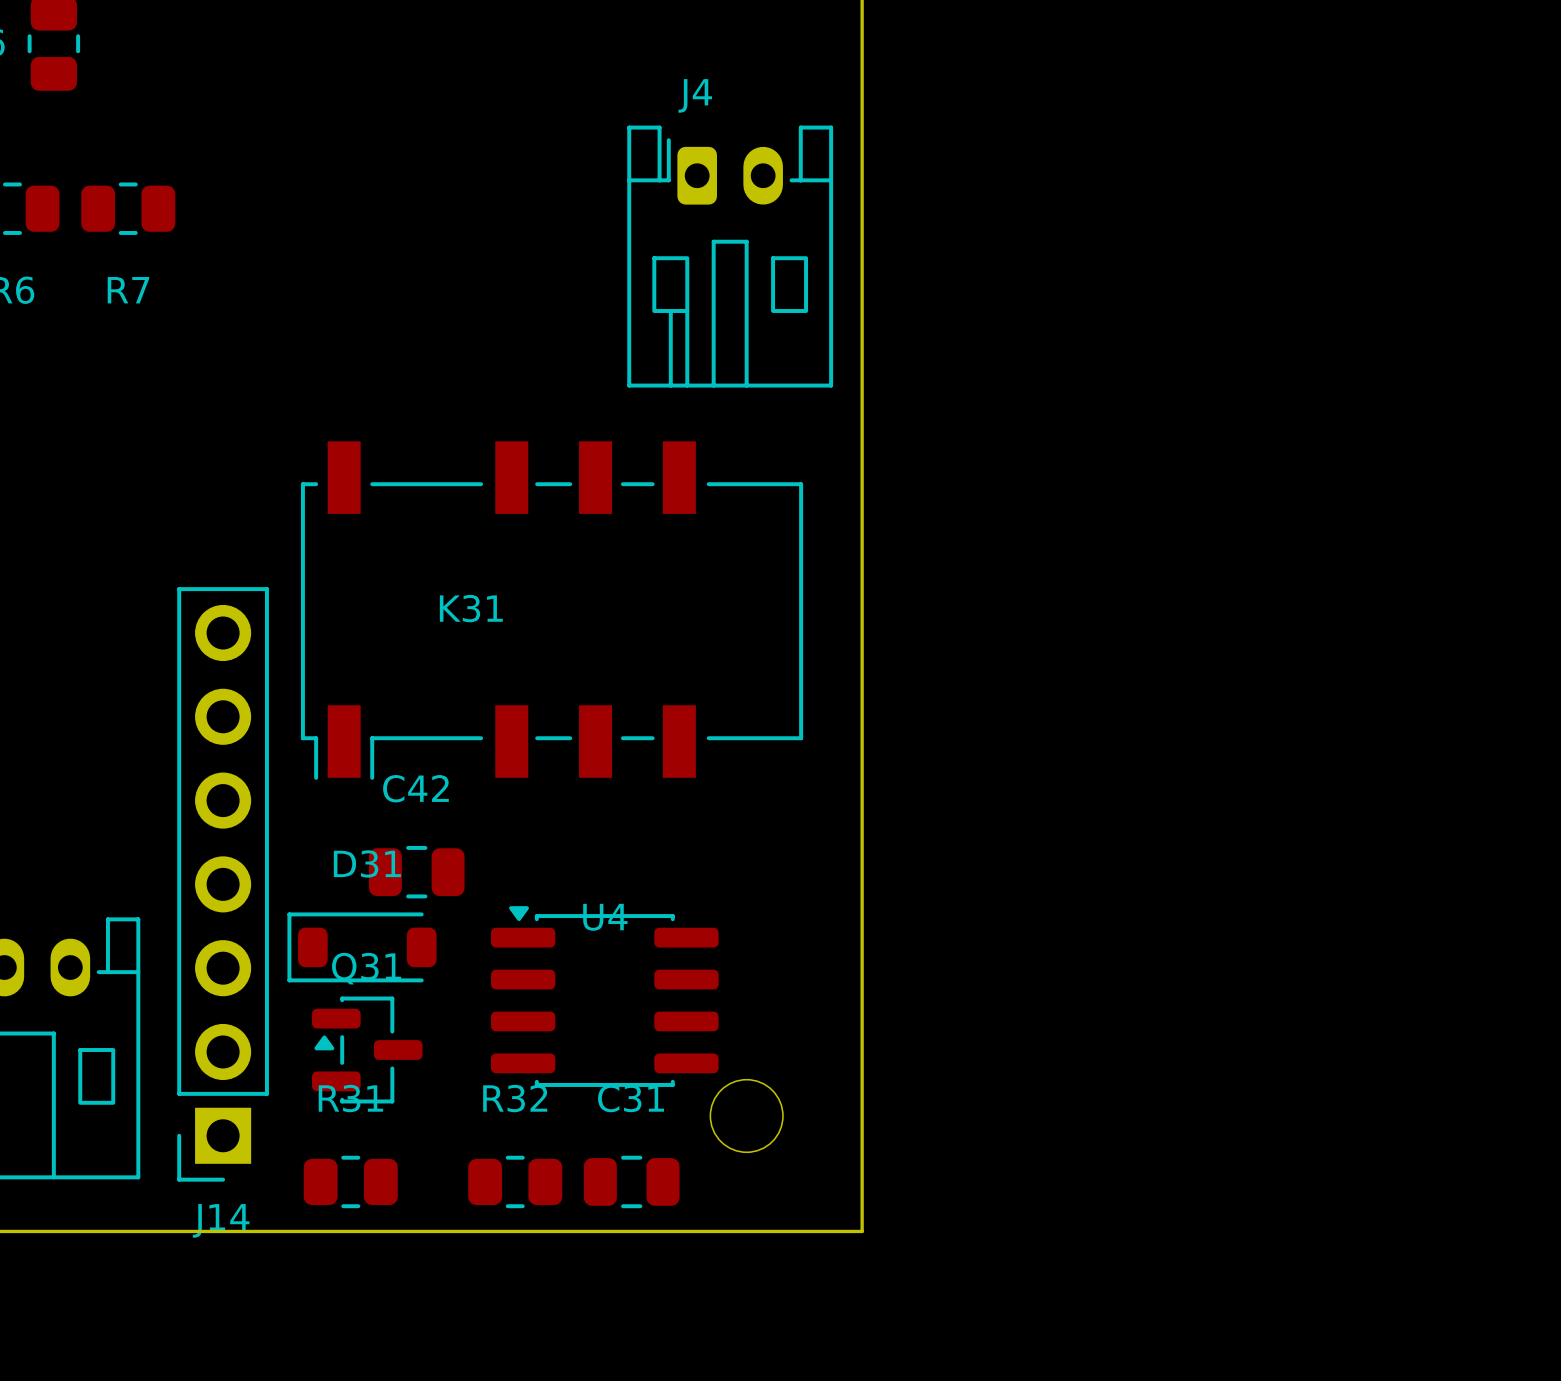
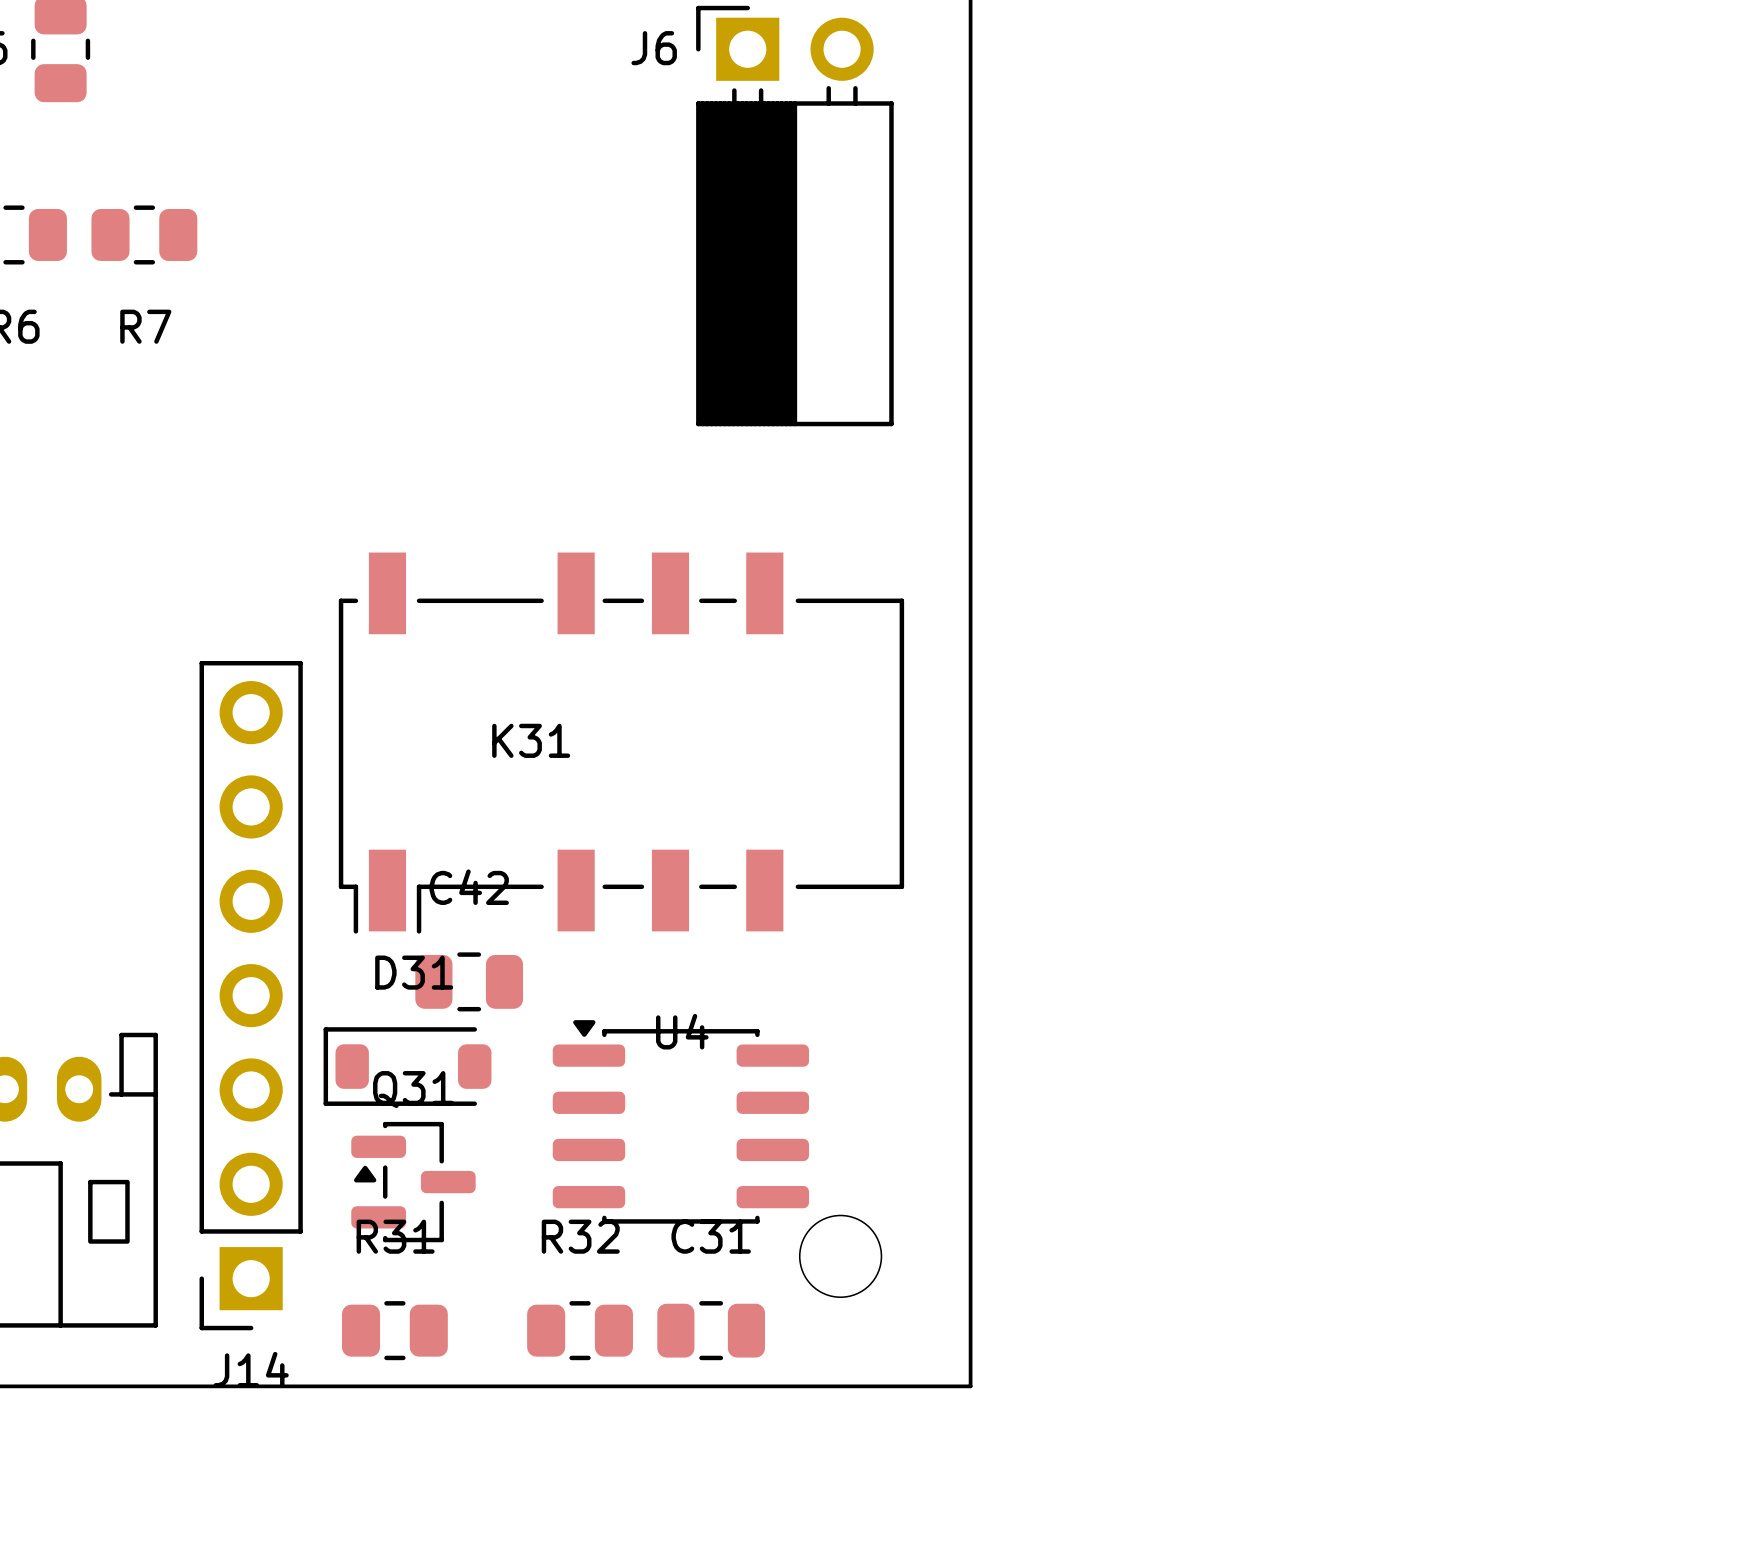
J6: none -> (794, 216)
J4: (730, 256) -> none
K31 position: (552, 610) -> (621, 743)

